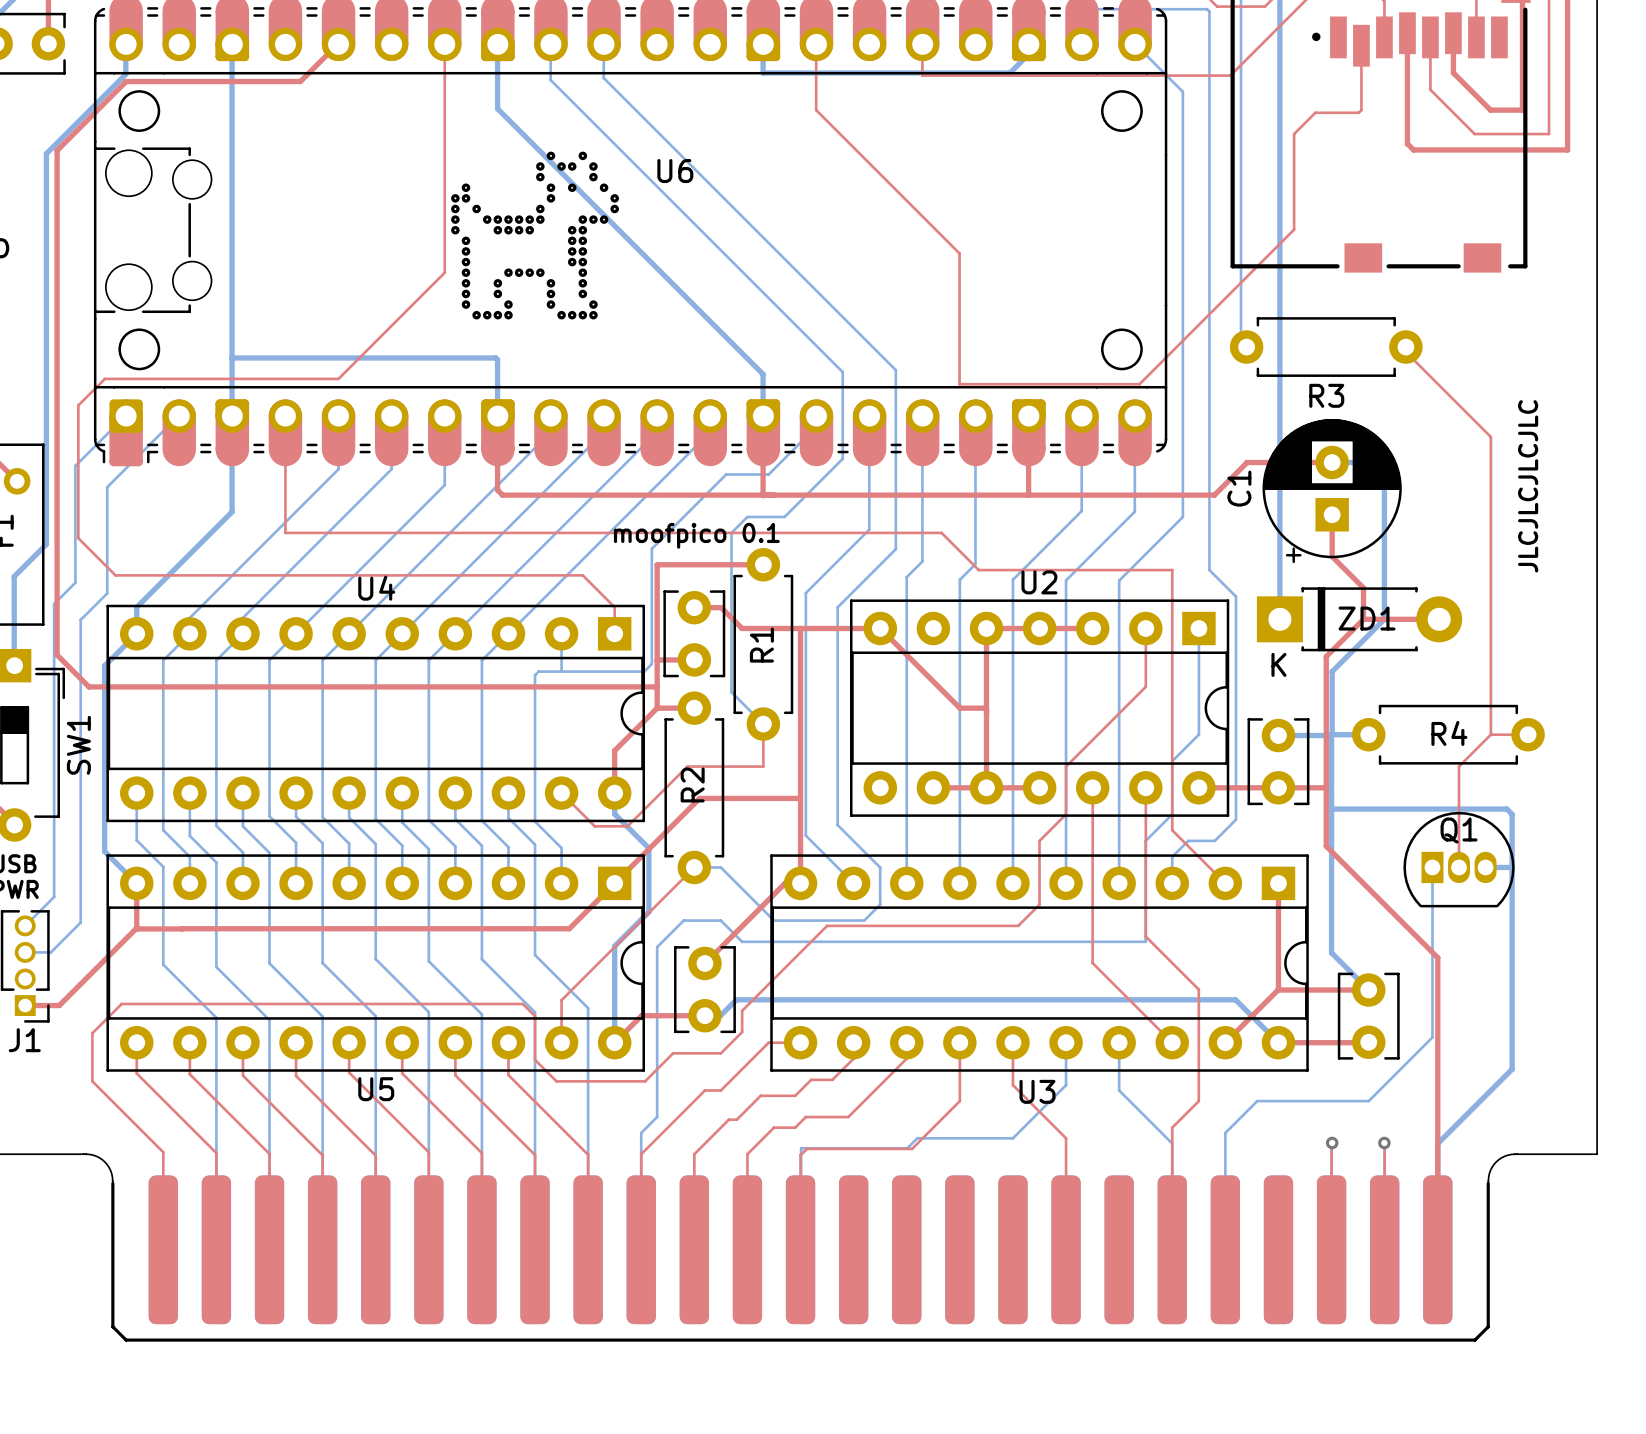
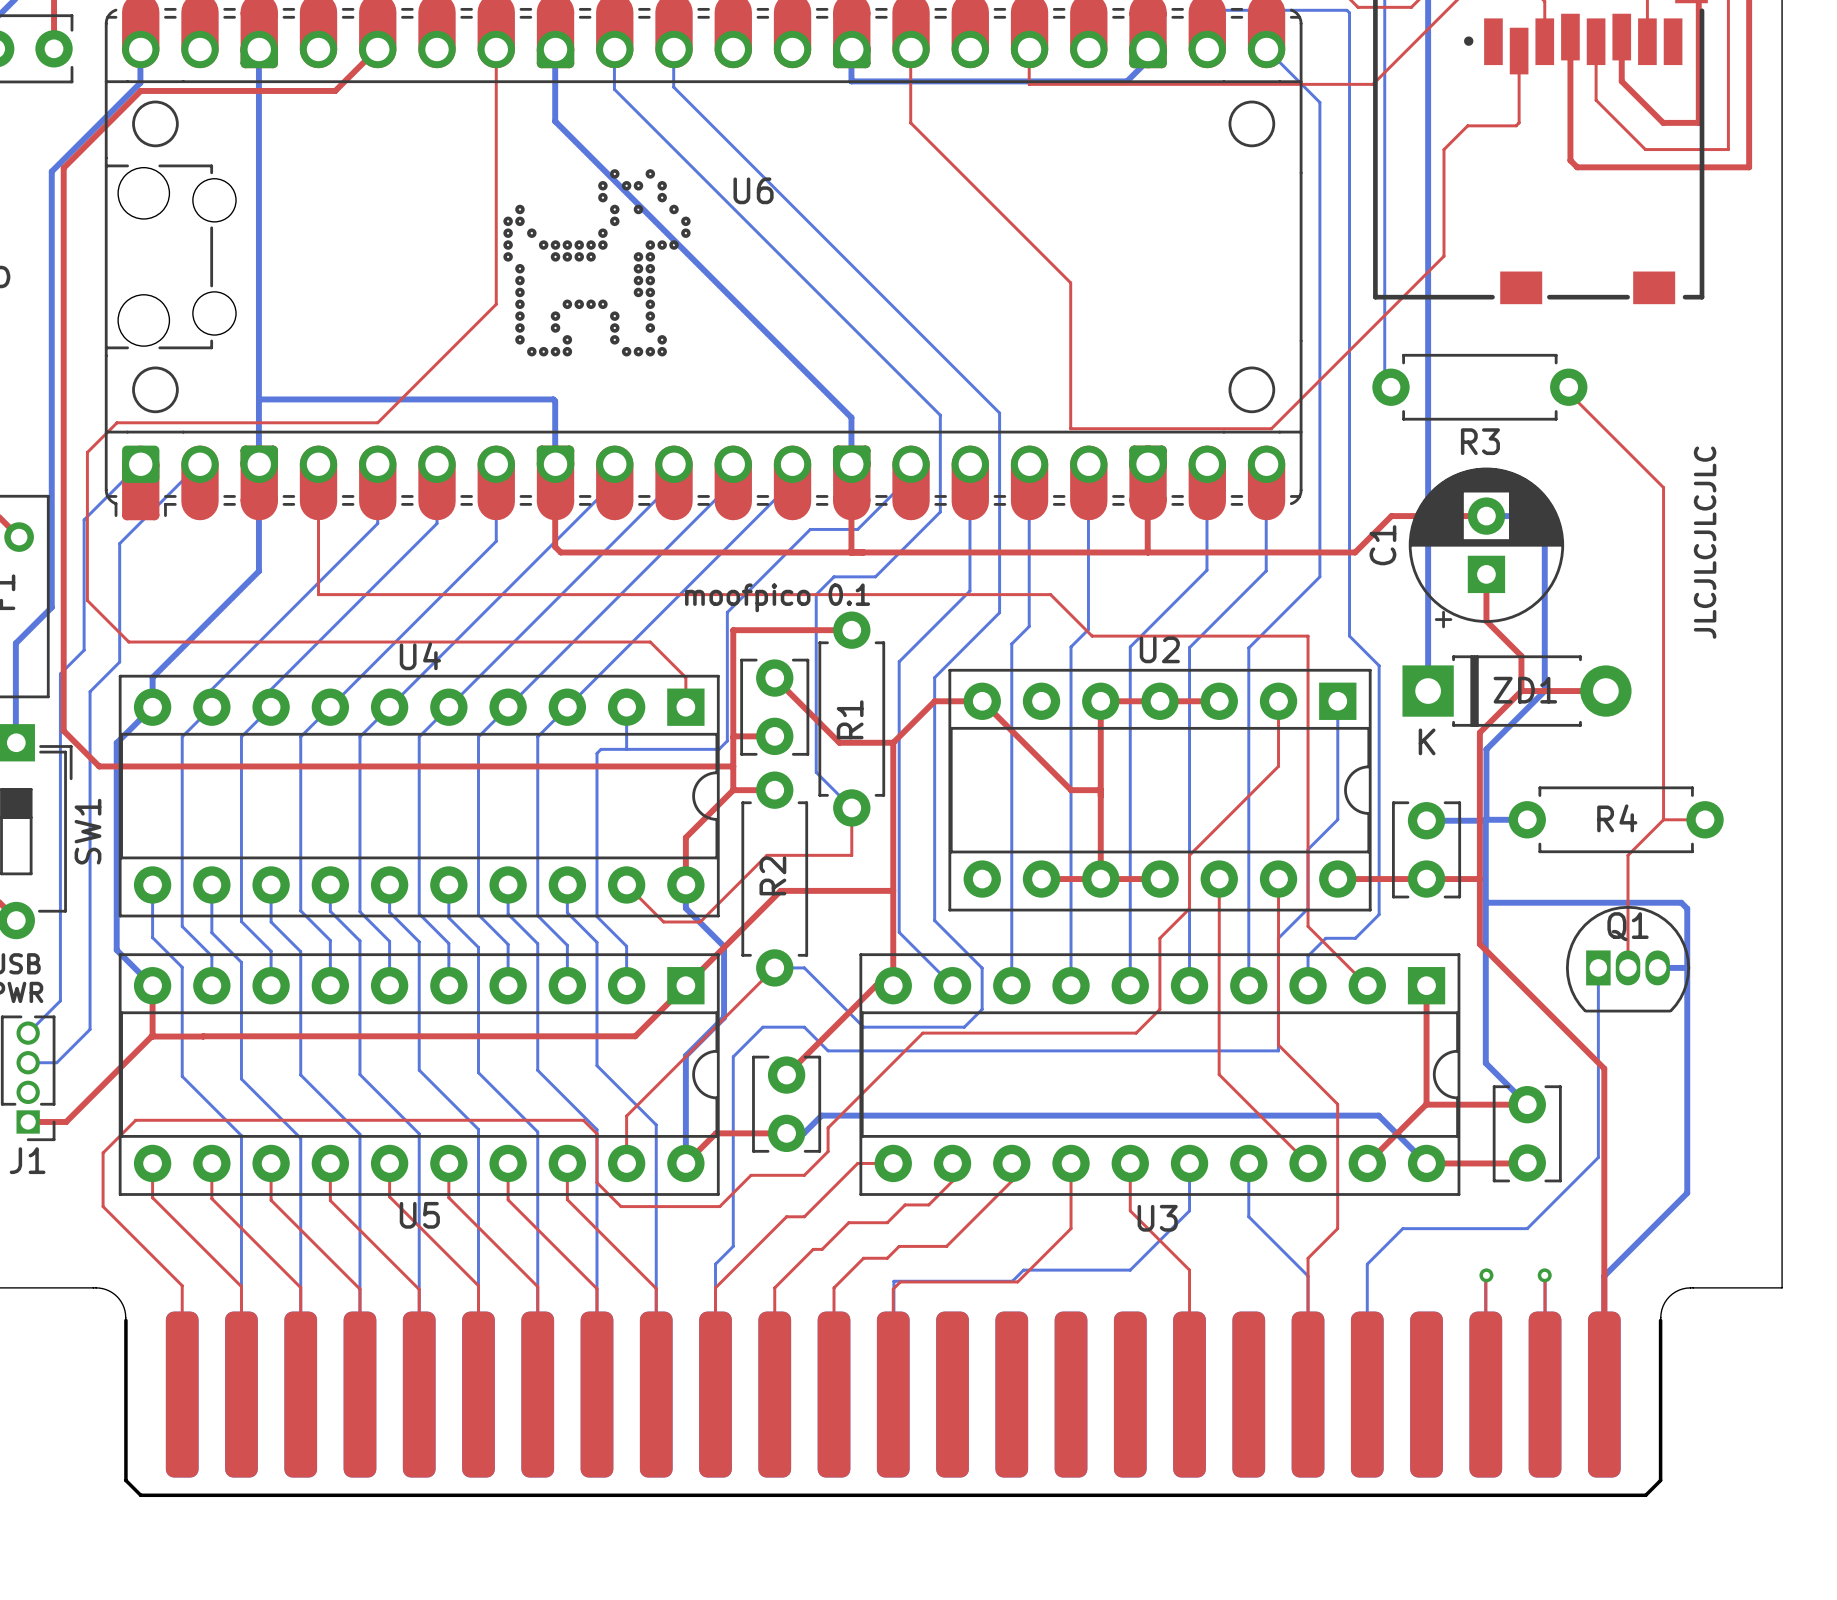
top track: (694, 607) (721, 607) (742, 628) (837, 628) -> (774, 678) (839, 742) (893, 742) (934, 701)
top track: (800, 628) (800, 665) -> none

